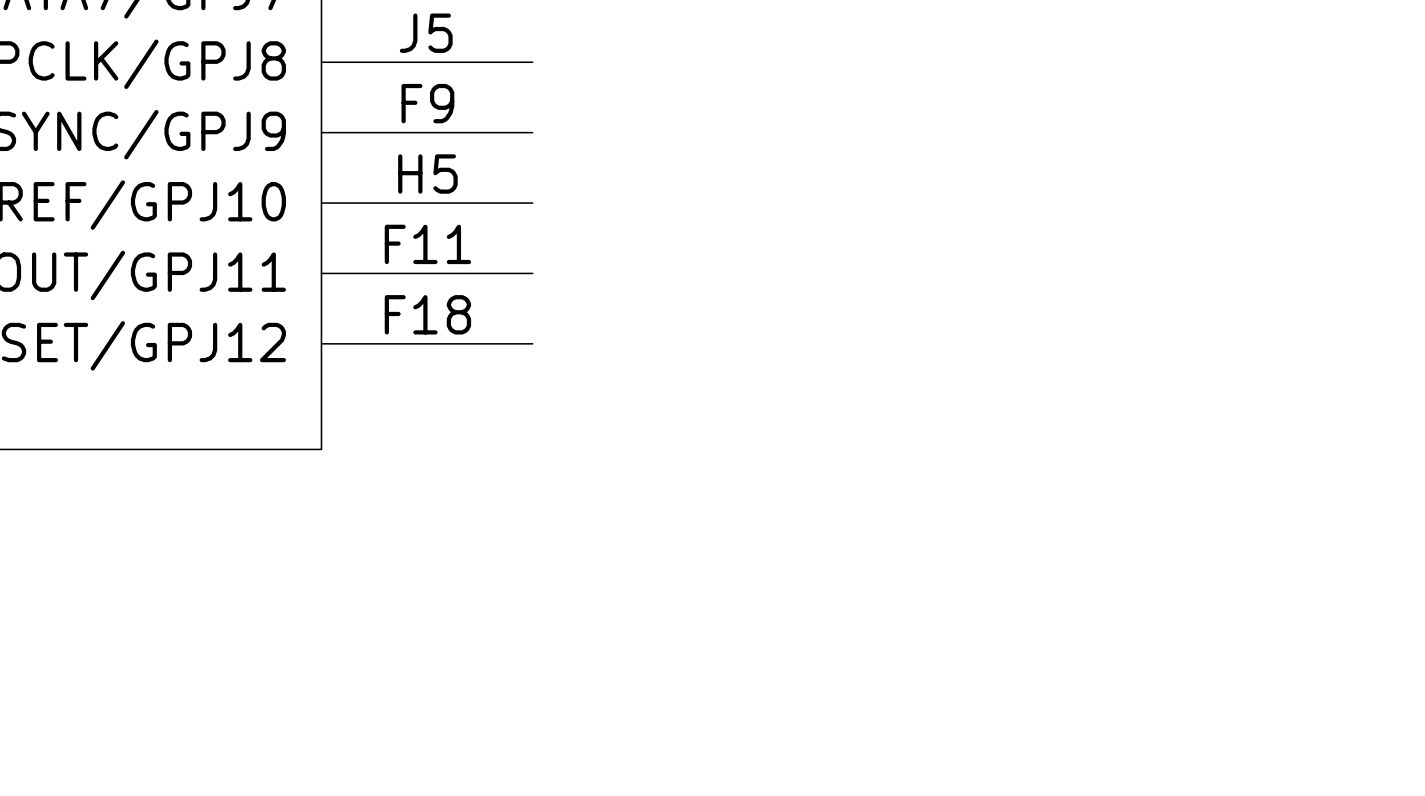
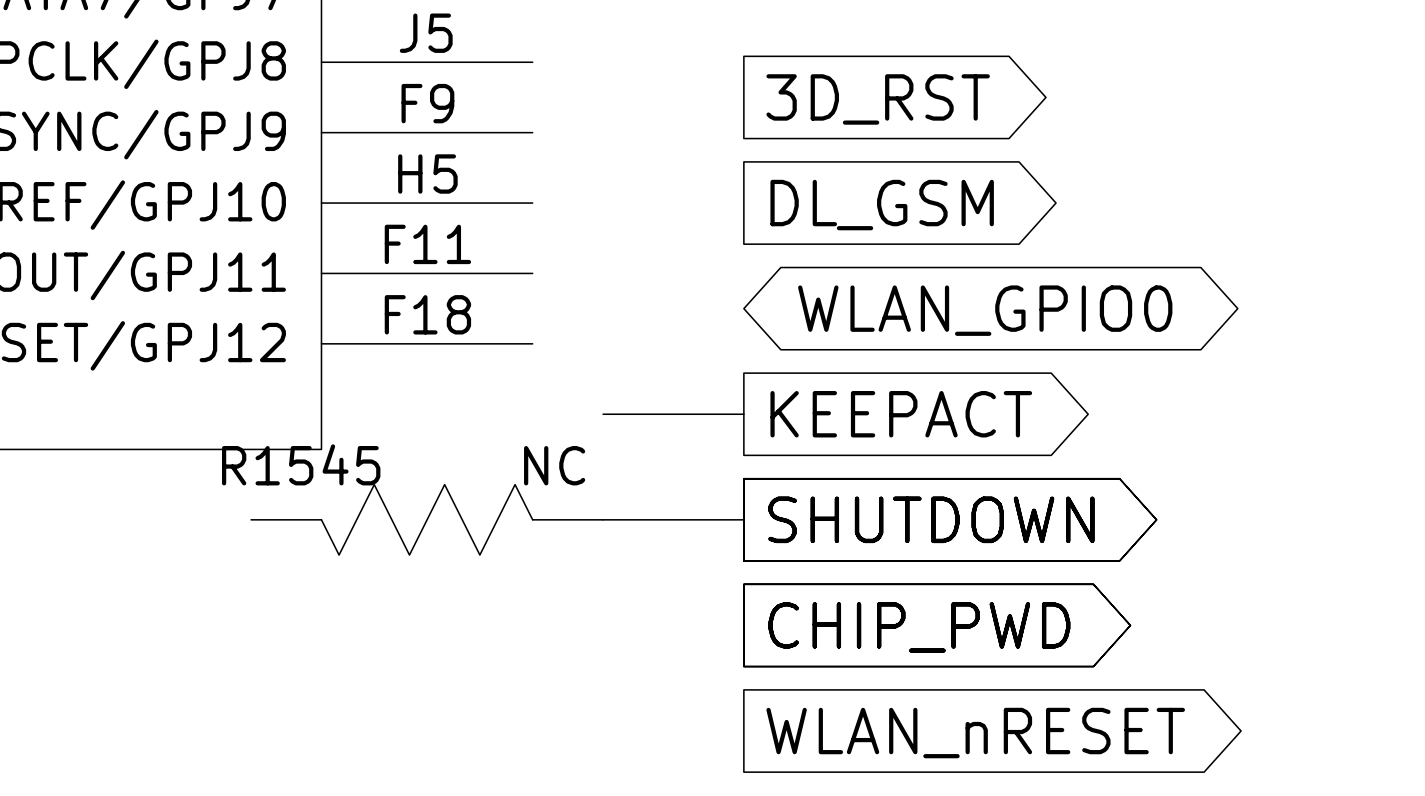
global label: none -> 3D_RST (878, 99)
global label: none -> DL_GSM (882, 205)
global label: none -> WLAN_GPIO0 (985, 310)
wire: none -> (603, 414) (743, 414)
global label: none -> KEEPACT (901, 414)
R1545: none -> NC (427, 519)
wire: none -> (603, 519) (743, 519)
global label: none -> SHUTDOWN (931, 519)
global label: none -> CHIP_PWD (919, 627)
global label: none -> WLAN_nRESET (975, 733)

